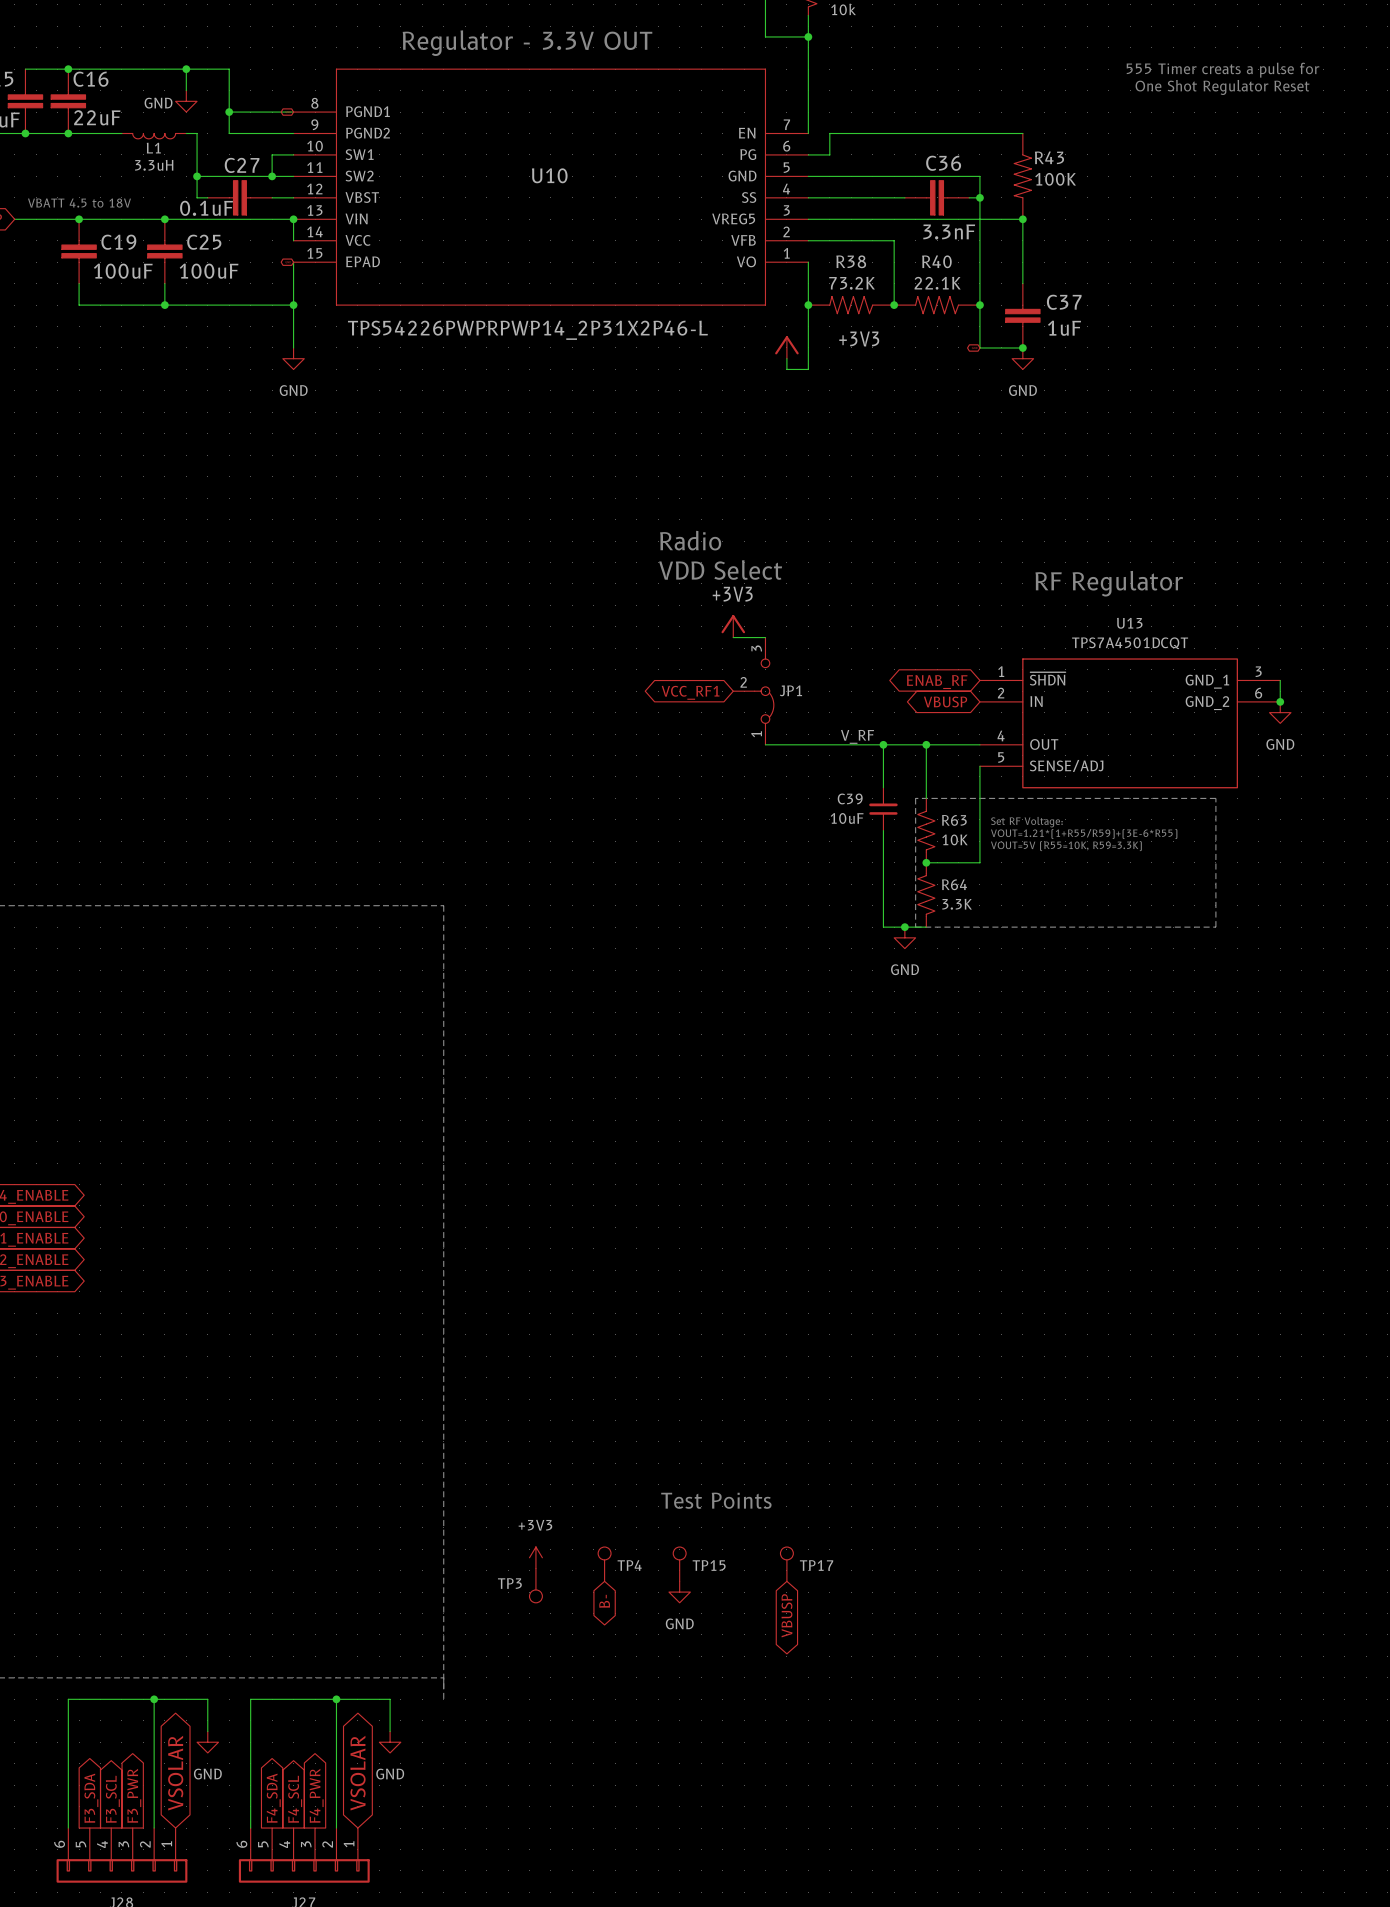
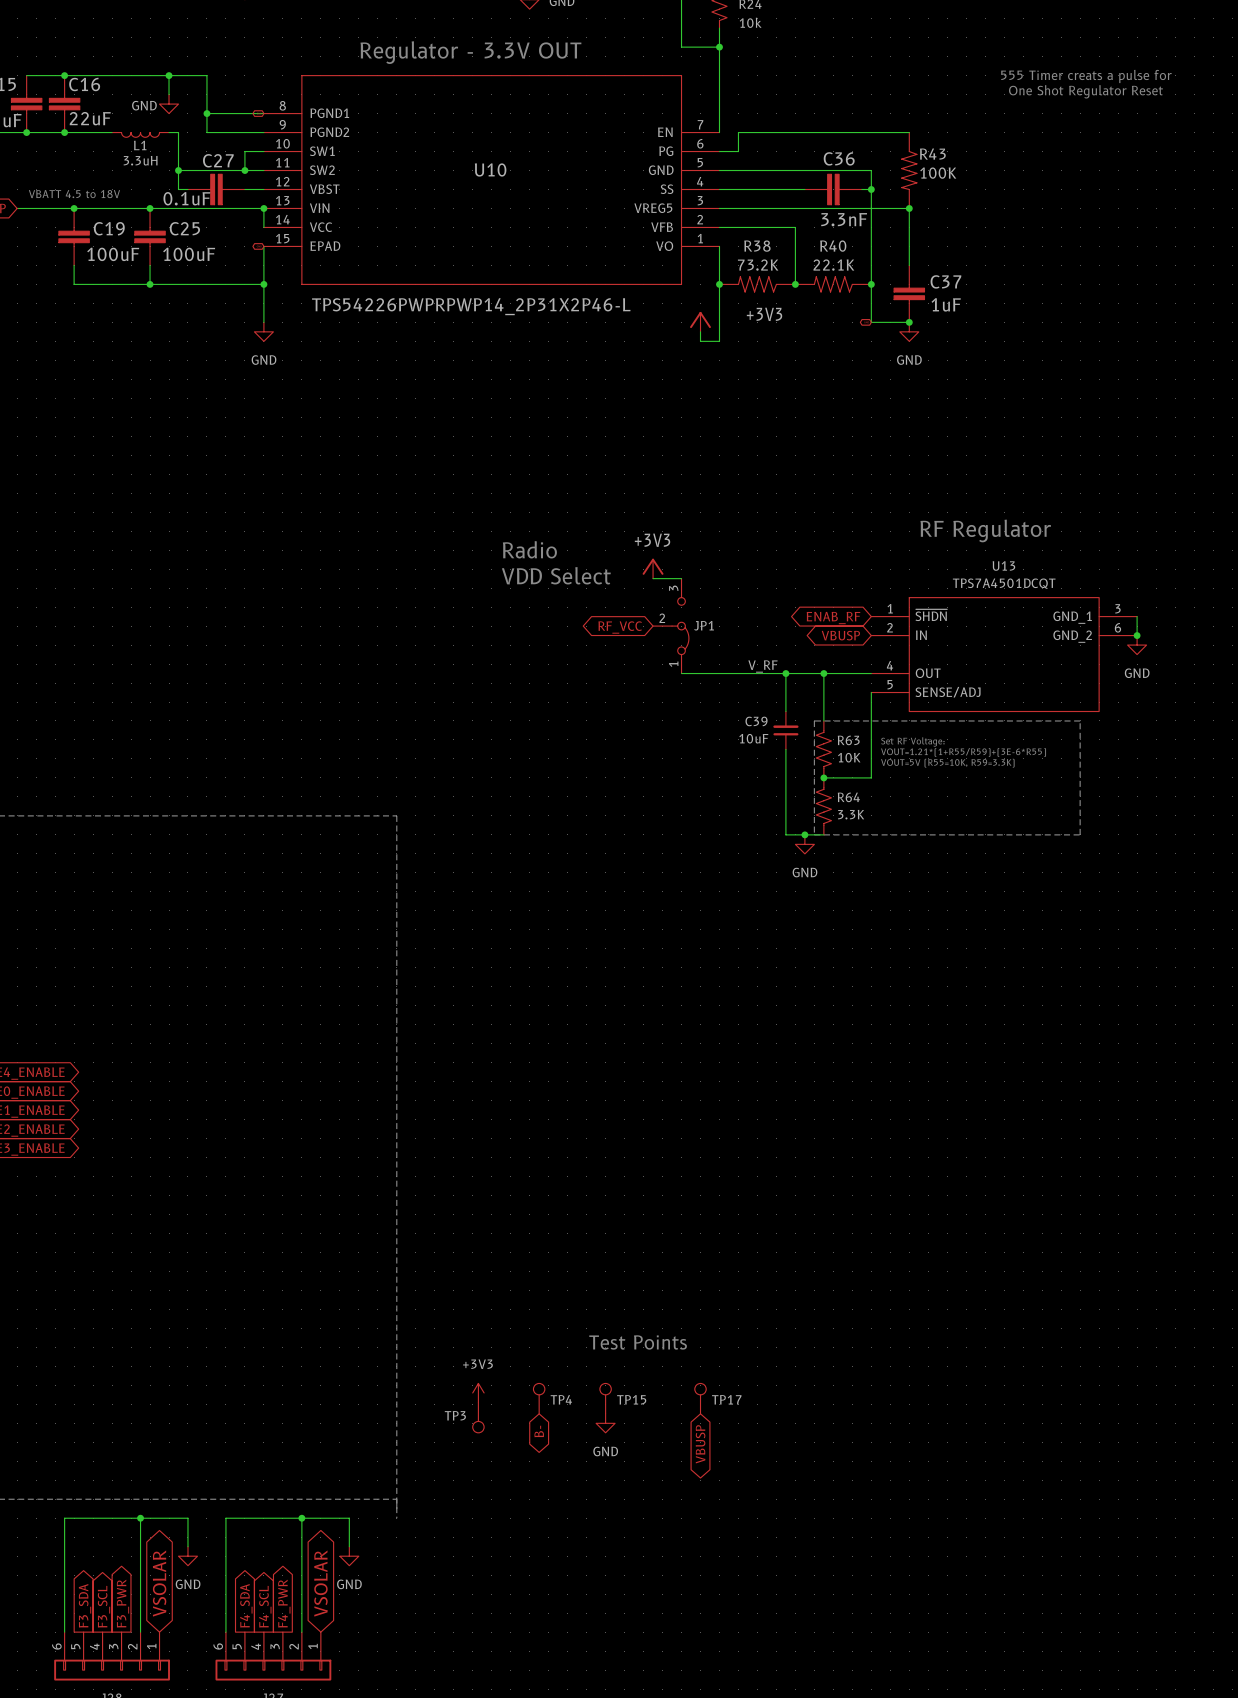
text position: Radio (690, 540) -> Radio (529, 549)
text position: VDD Select (720, 570) -> VDD Select (556, 575)
global label: VCC_RF1 (690, 692) -> RF_VCC (620, 627)

